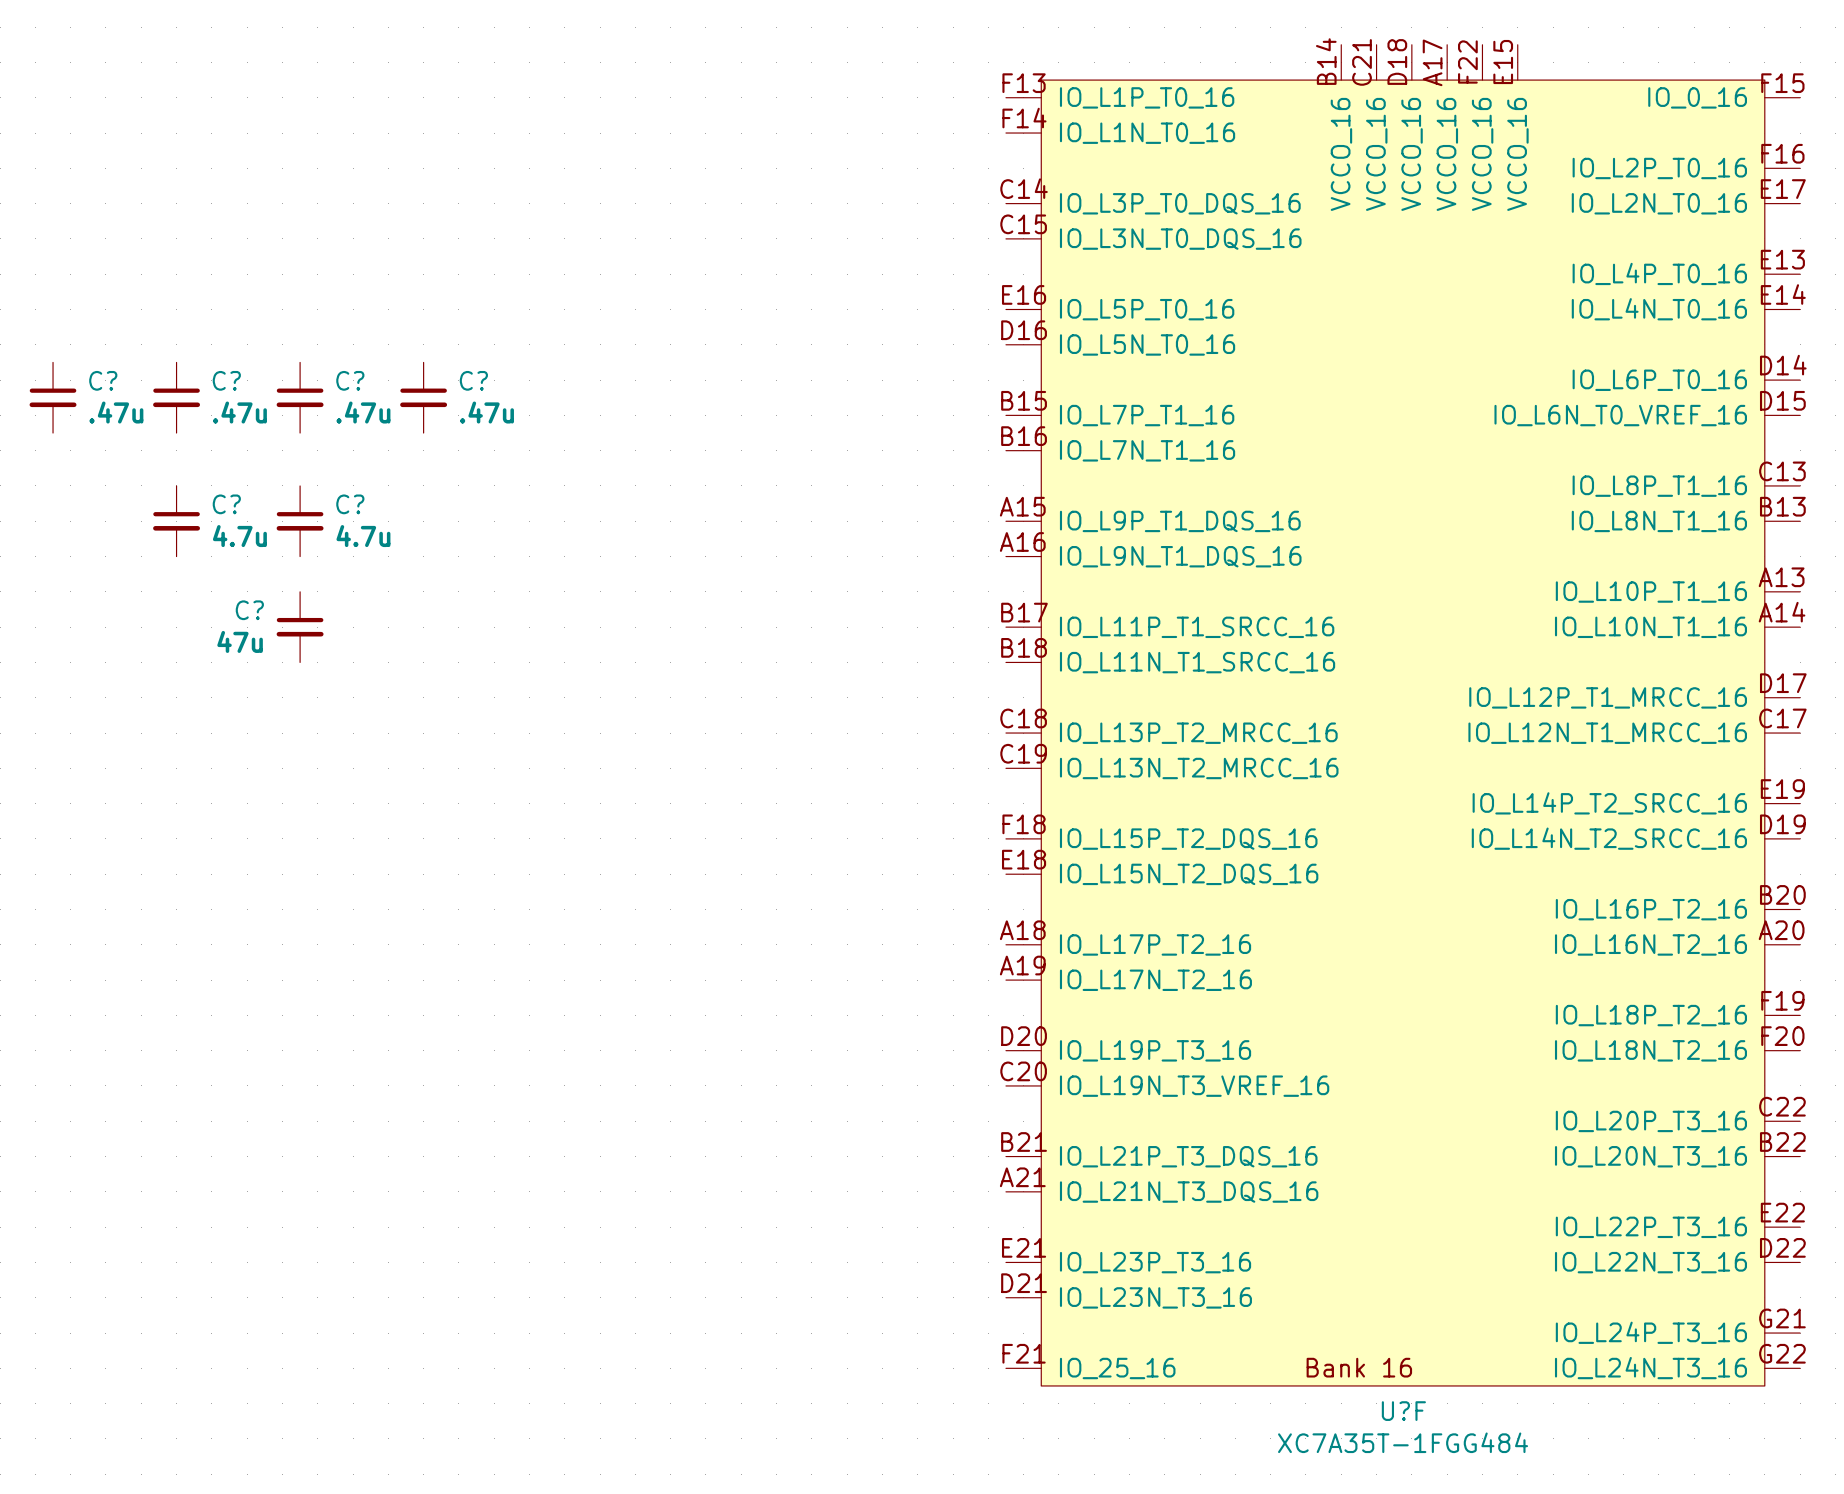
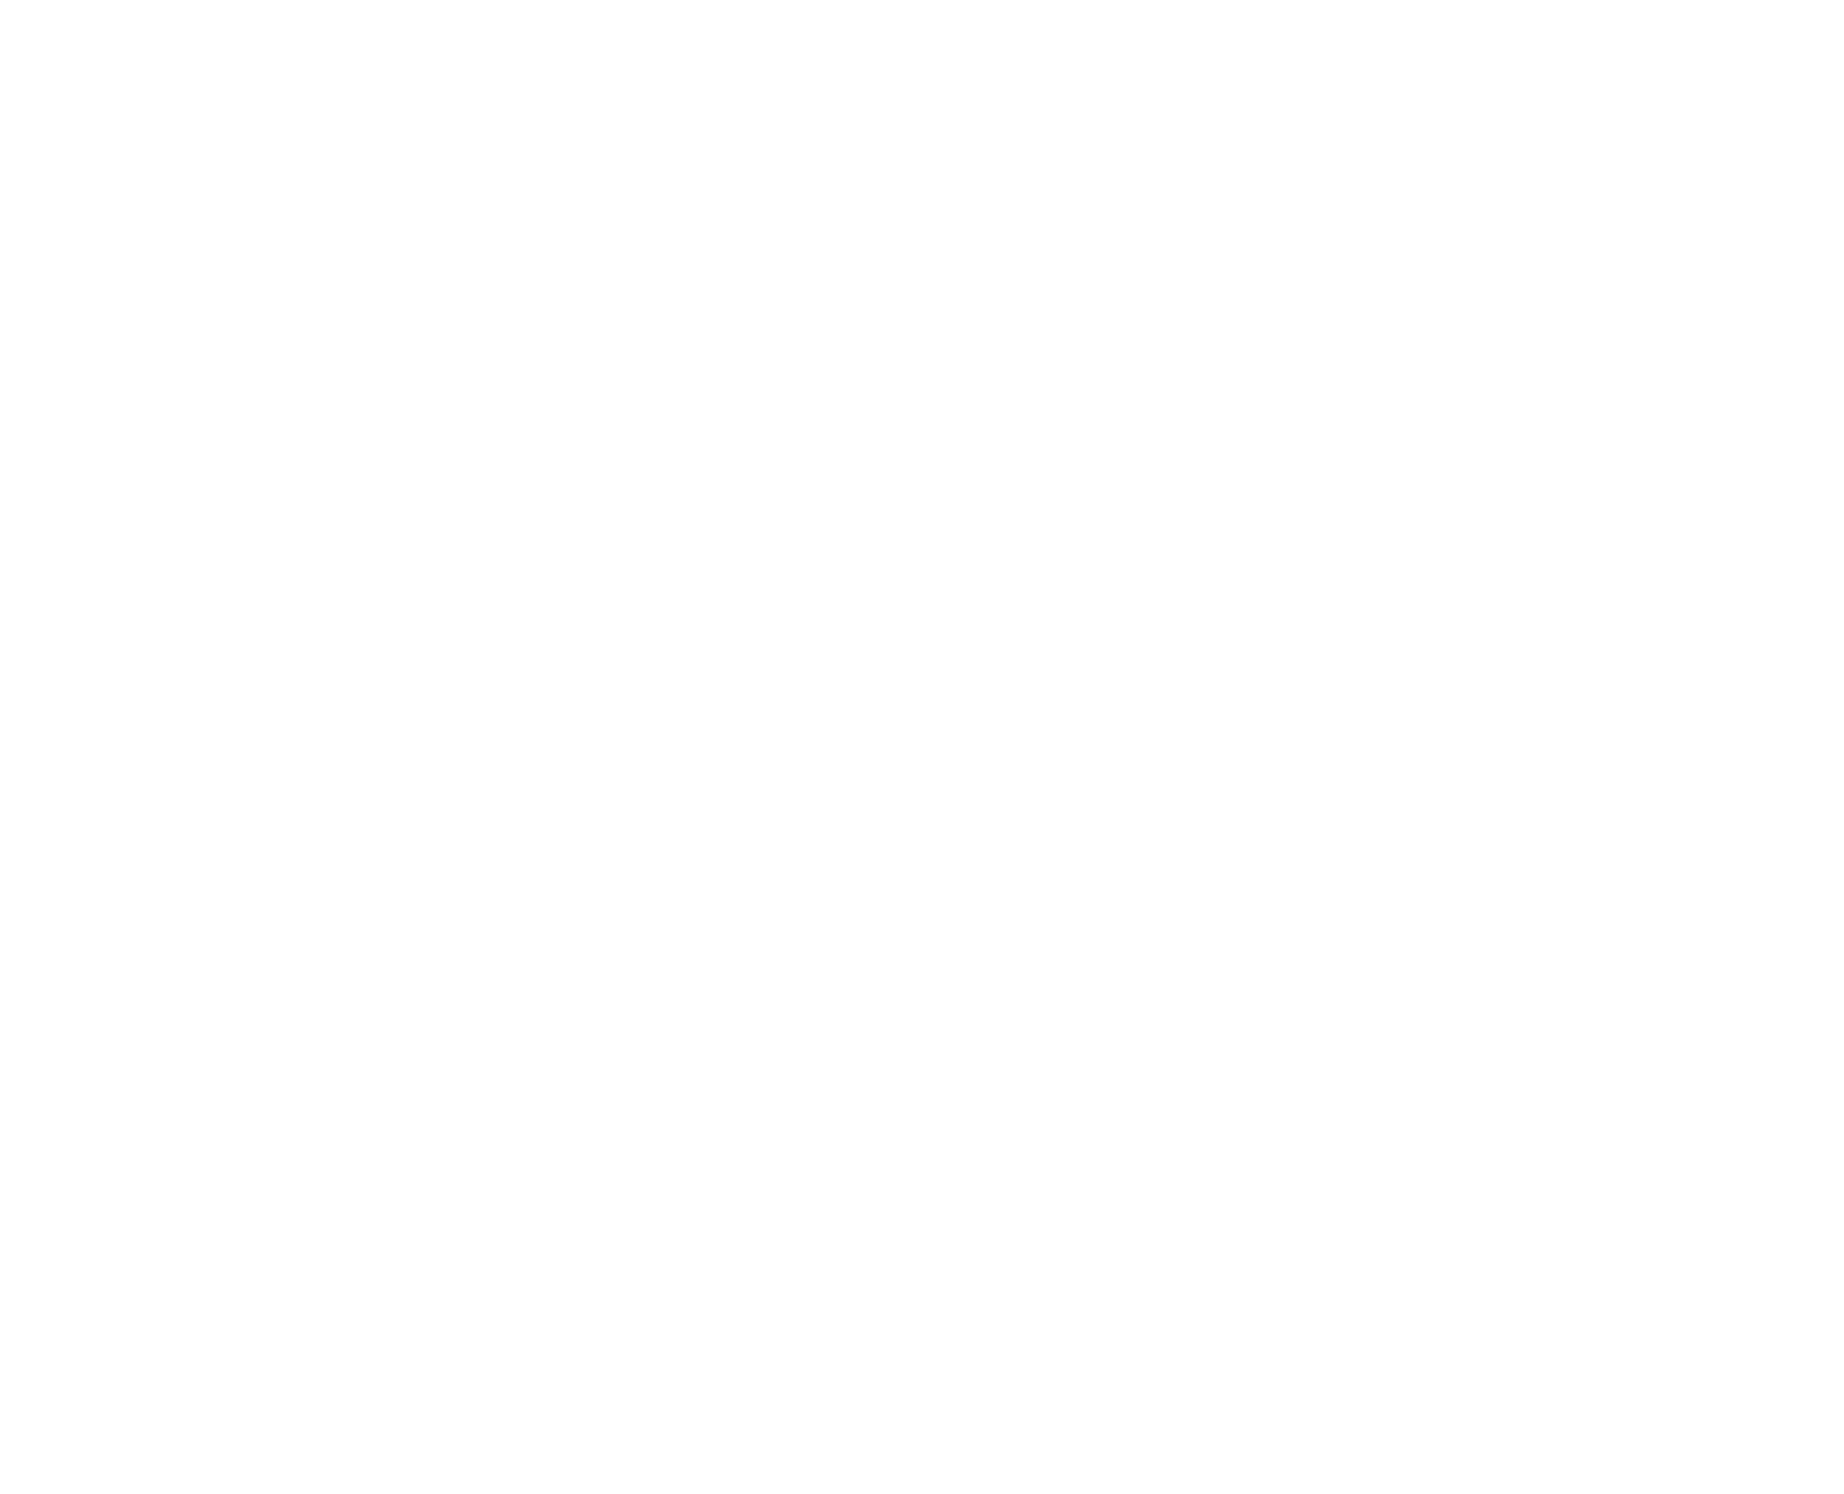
C?: .47u (53, 397) -> none
C?: .47u (176, 397) -> none
C?: .47u (300, 397) -> none
C?: .47u (423, 397) -> none
C?: 4.7u (176, 521) -> none
C?: 4.7u (300, 521) -> none
C?: 47u (300, 627) -> none
U?F: XC7A35T-1FGG484 (1403, 715) -> none

